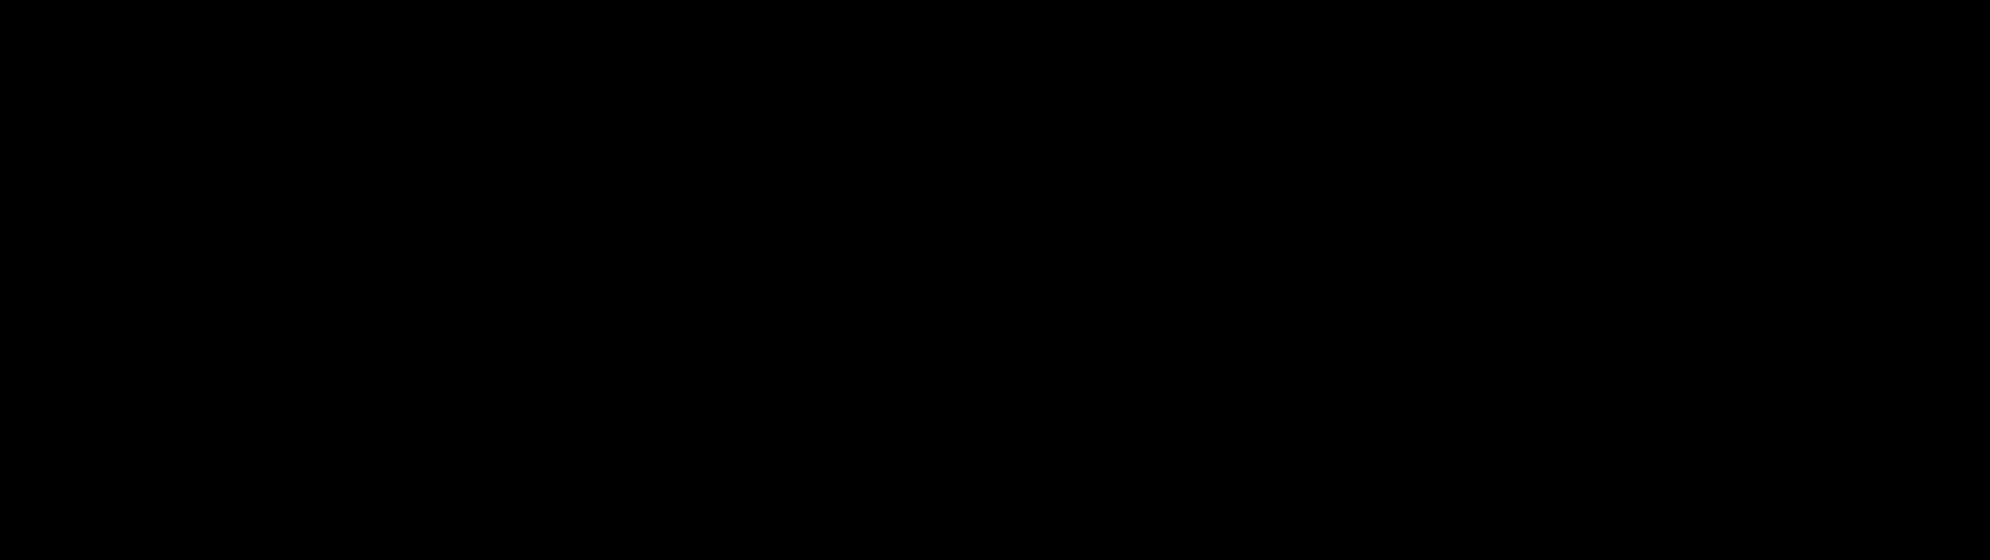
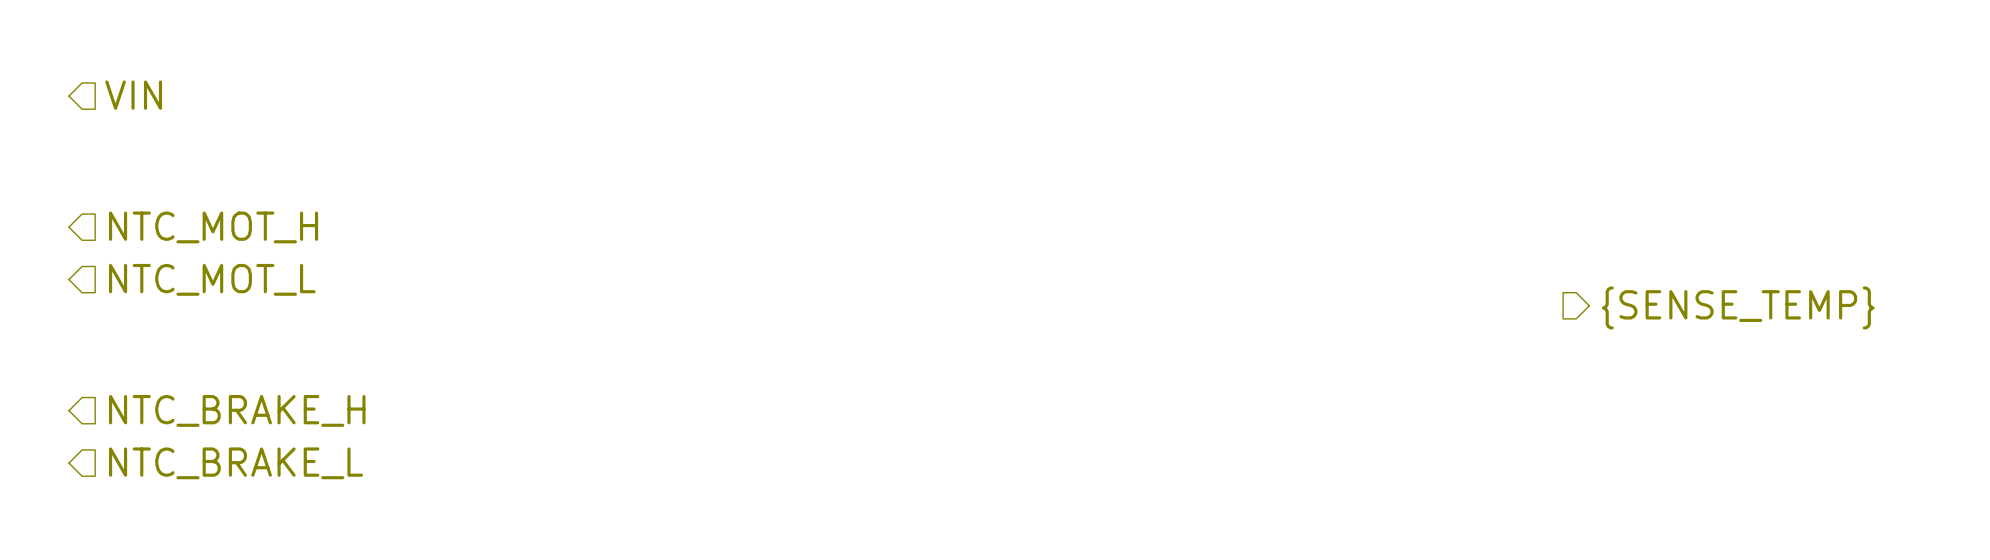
hierarchical label: none -> VIN (133, 95)
hierarchical label: none -> NTC_MOT_H (213, 227)
hierarchical label: none -> NTC_MOT_L (212, 279)
hierarchical label: none -> {SENSE_TEMP} (1738, 307)
hierarchical label: none -> NTC_BRAKE_H (237, 410)
hierarchical label: none -> NTC_BRAKE_L (236, 463)

